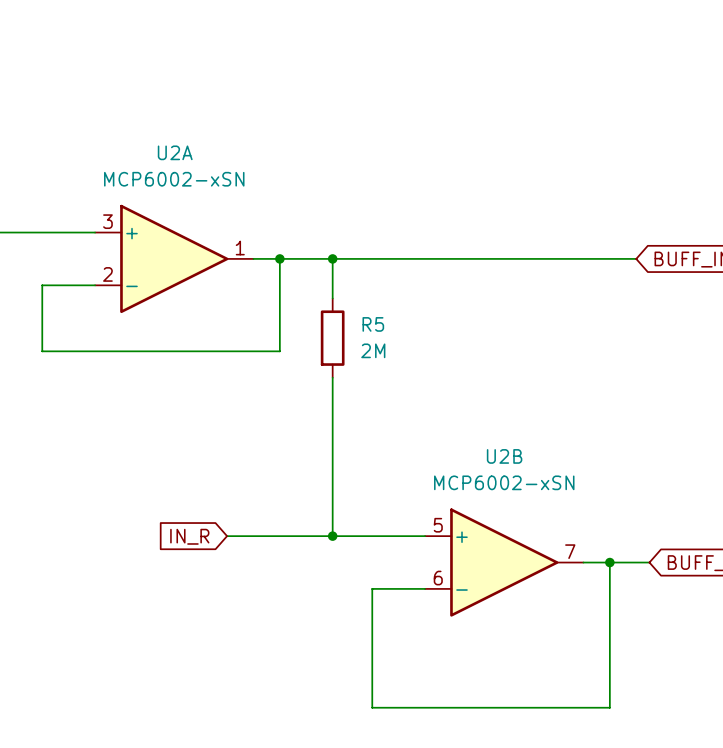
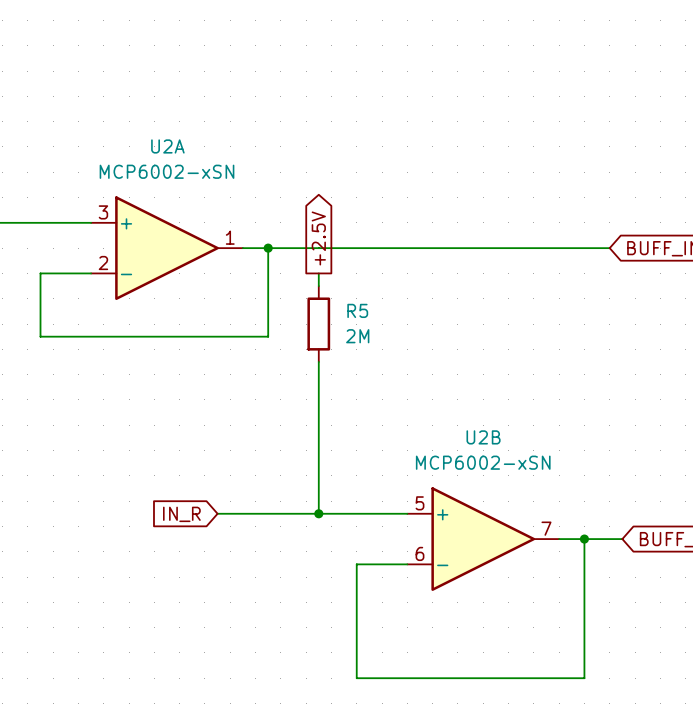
global label: none -> +2.5V (318, 238)
wire: (332, 258) (332, 285) -> none
junction: (332, 258) -> none

